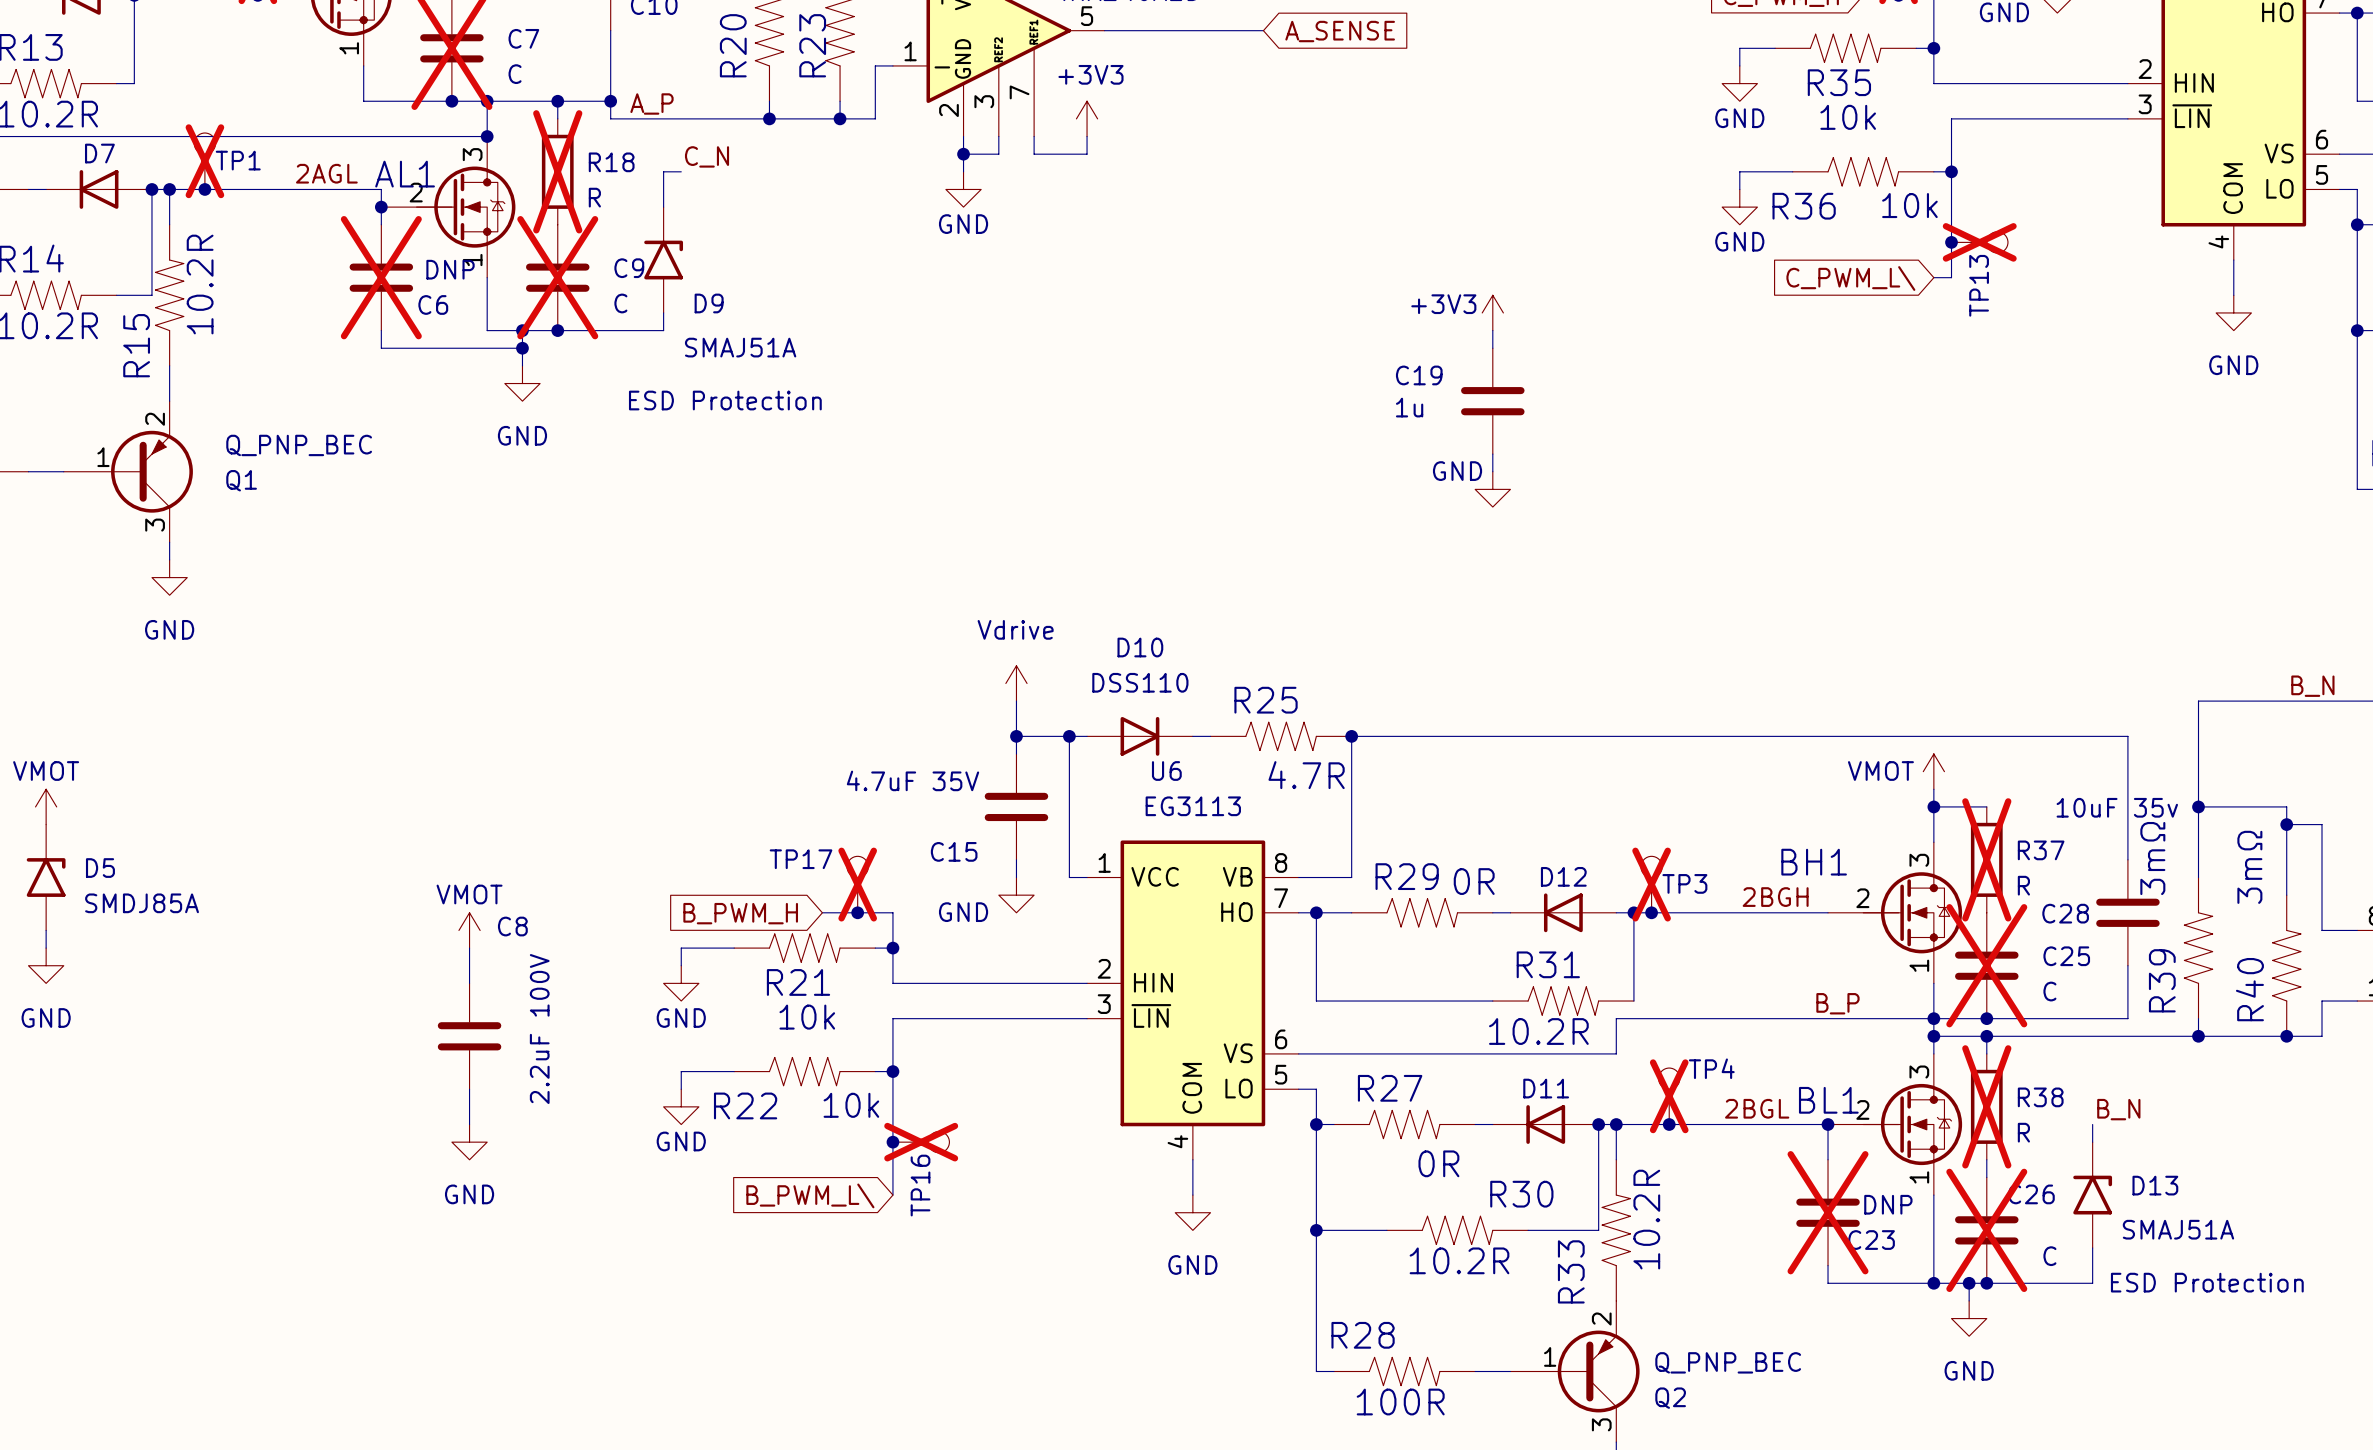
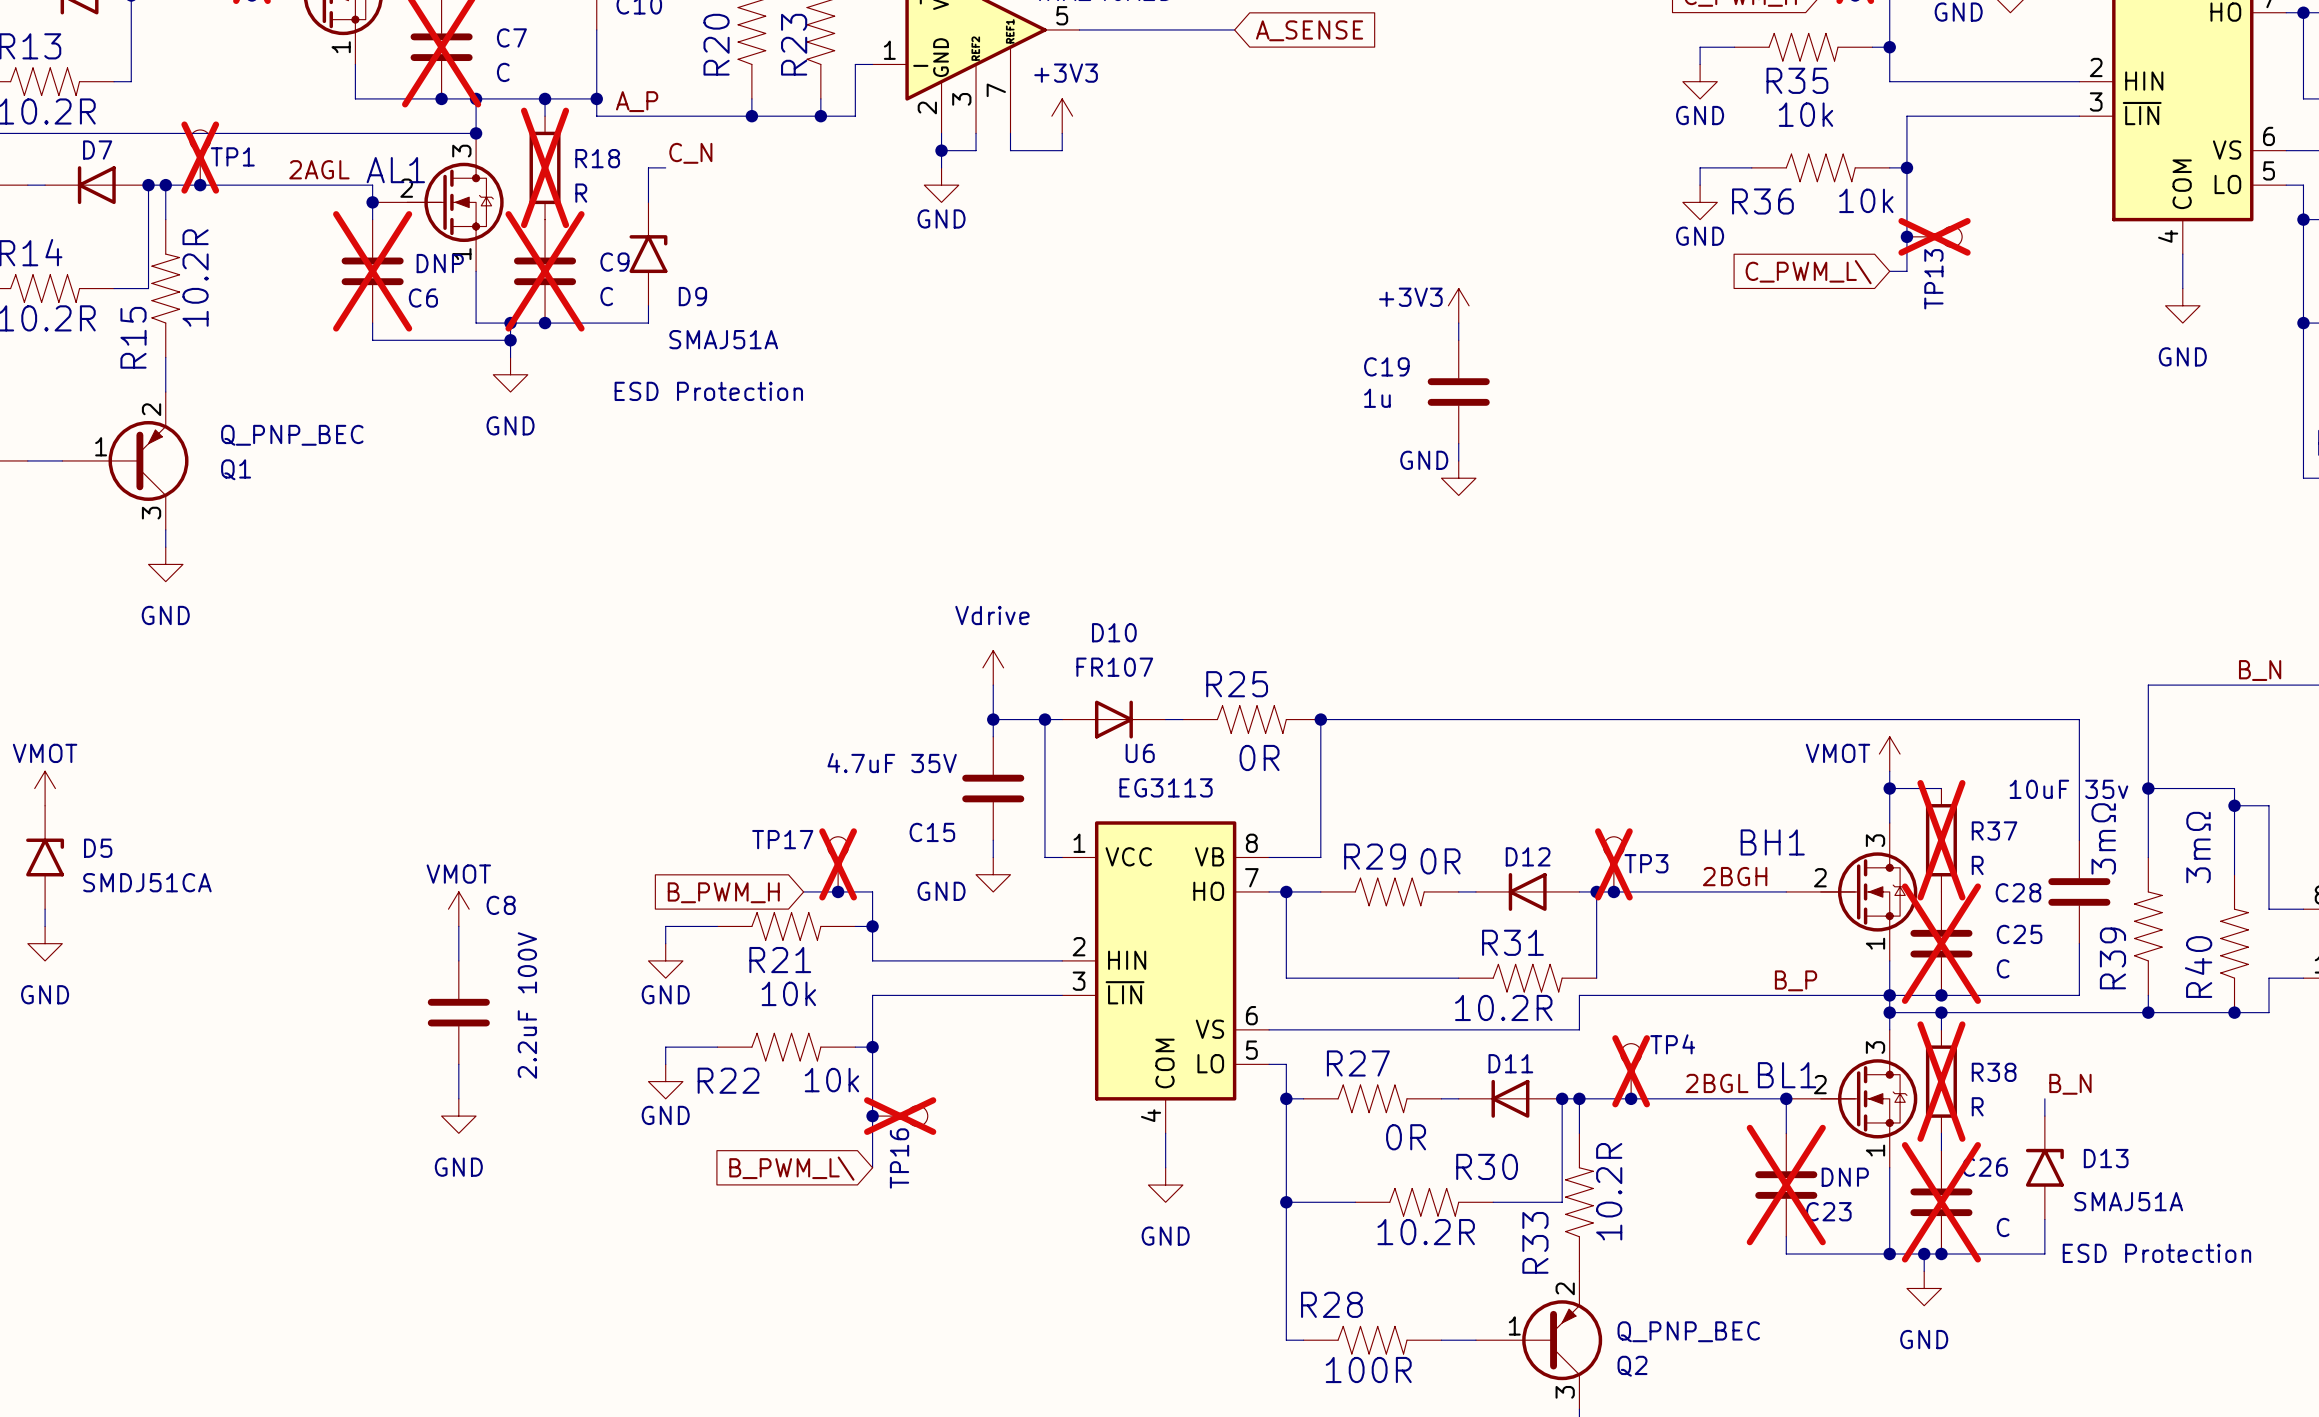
D10 value: DSS110 (1140, 682) -> FR107 (1114, 667)
R25 value: 4.7R (1306, 775) -> 0R (1259, 757)
D5 value: SMDJ85A (142, 903) -> SMDJ51CA (147, 882)

